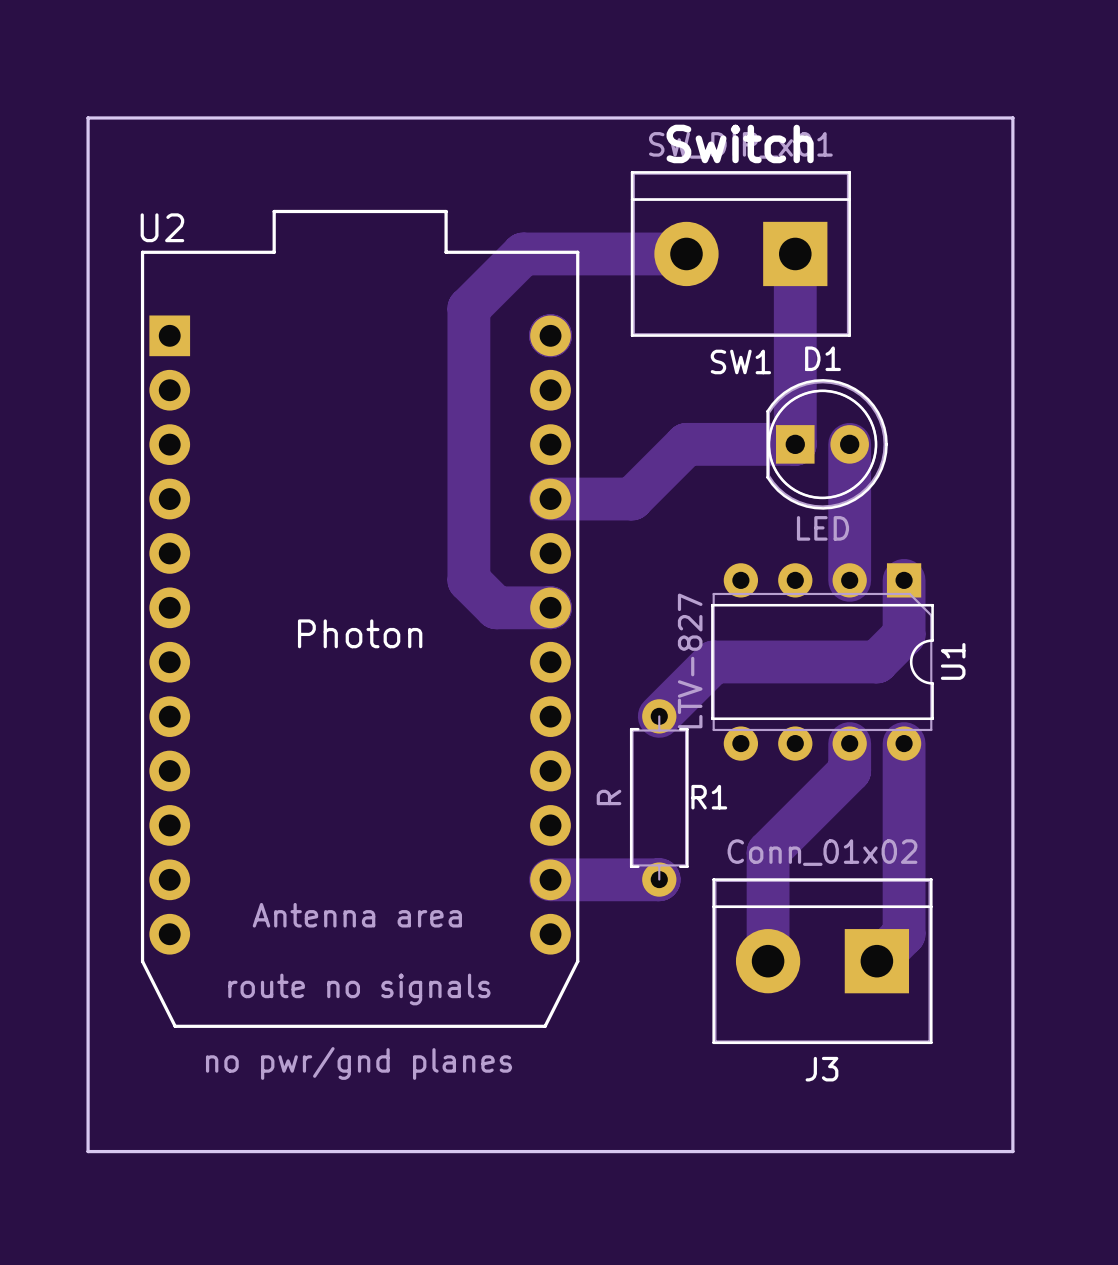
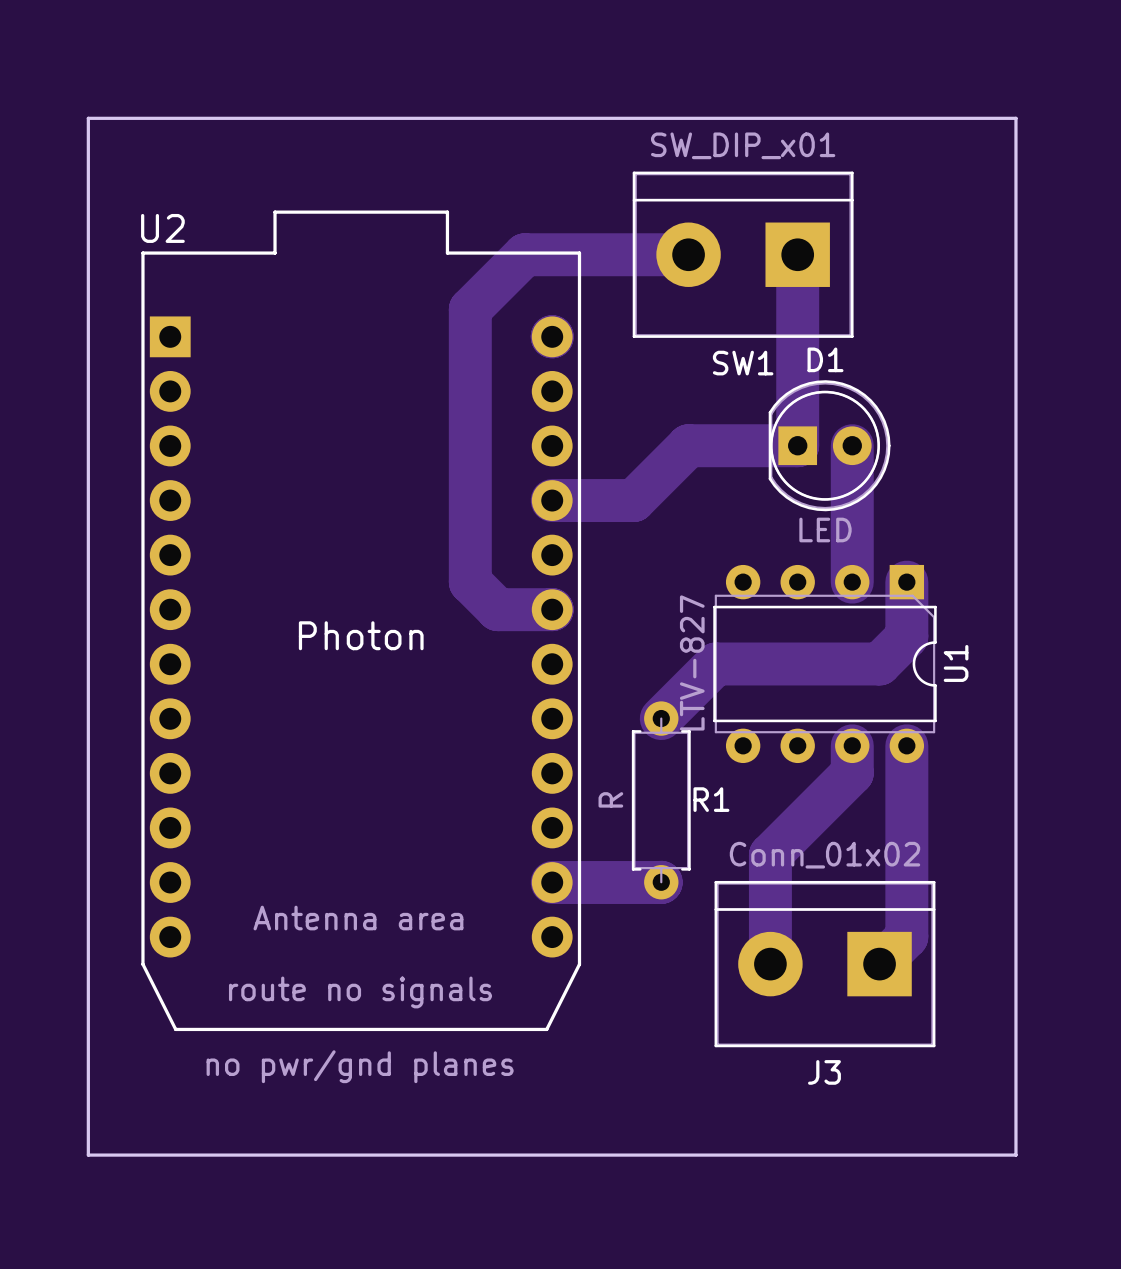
text: Switch (740, 143) -> none

